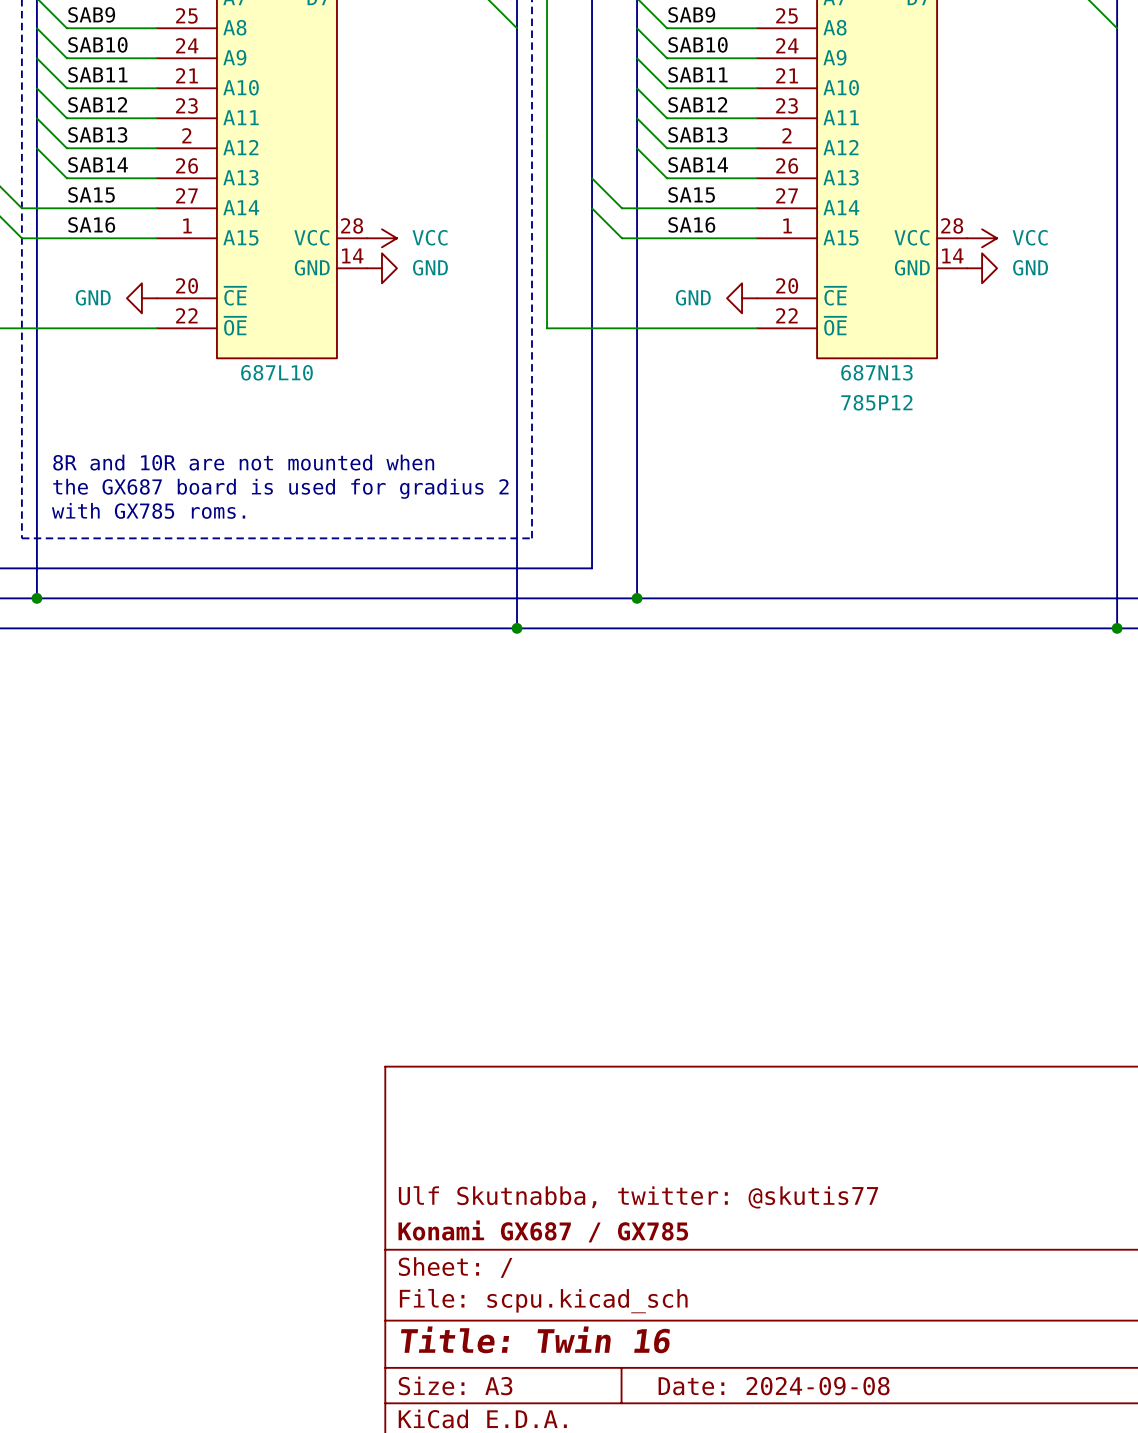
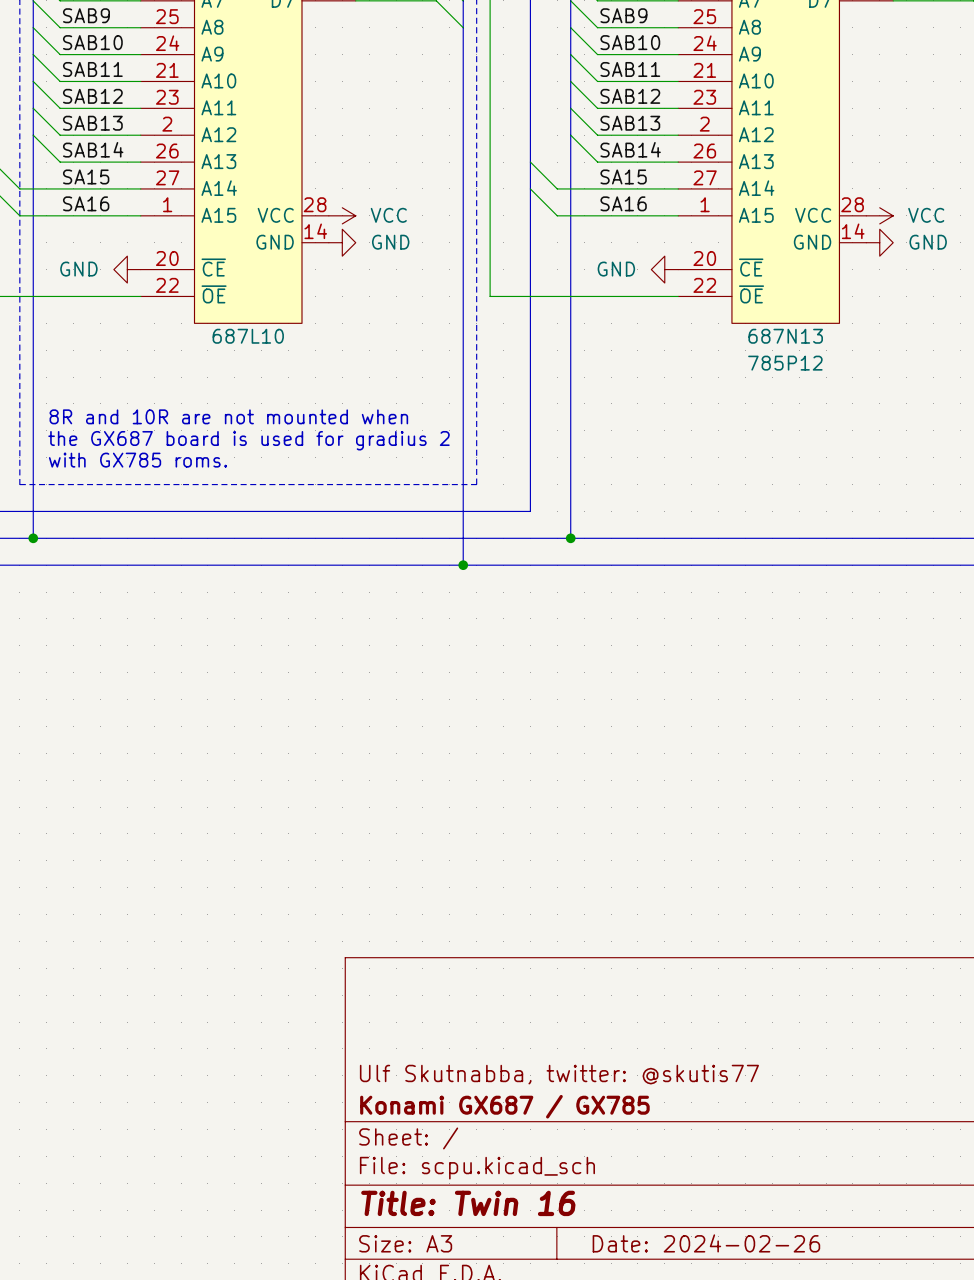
title block: Date: 2024-09-08 (774, 1386) -> Date: 2024-02-26 (706, 1243)

